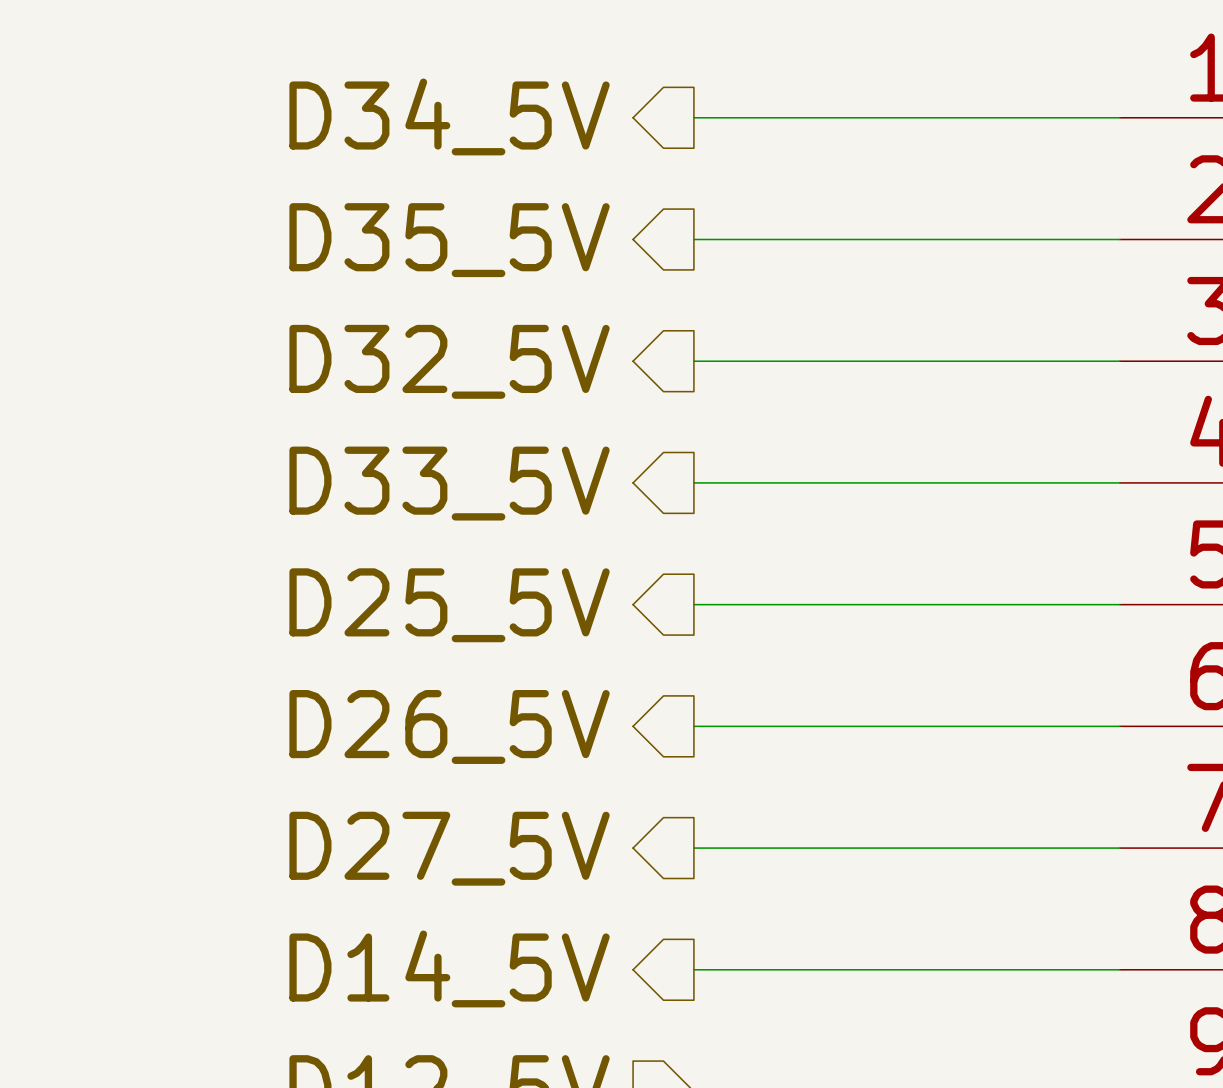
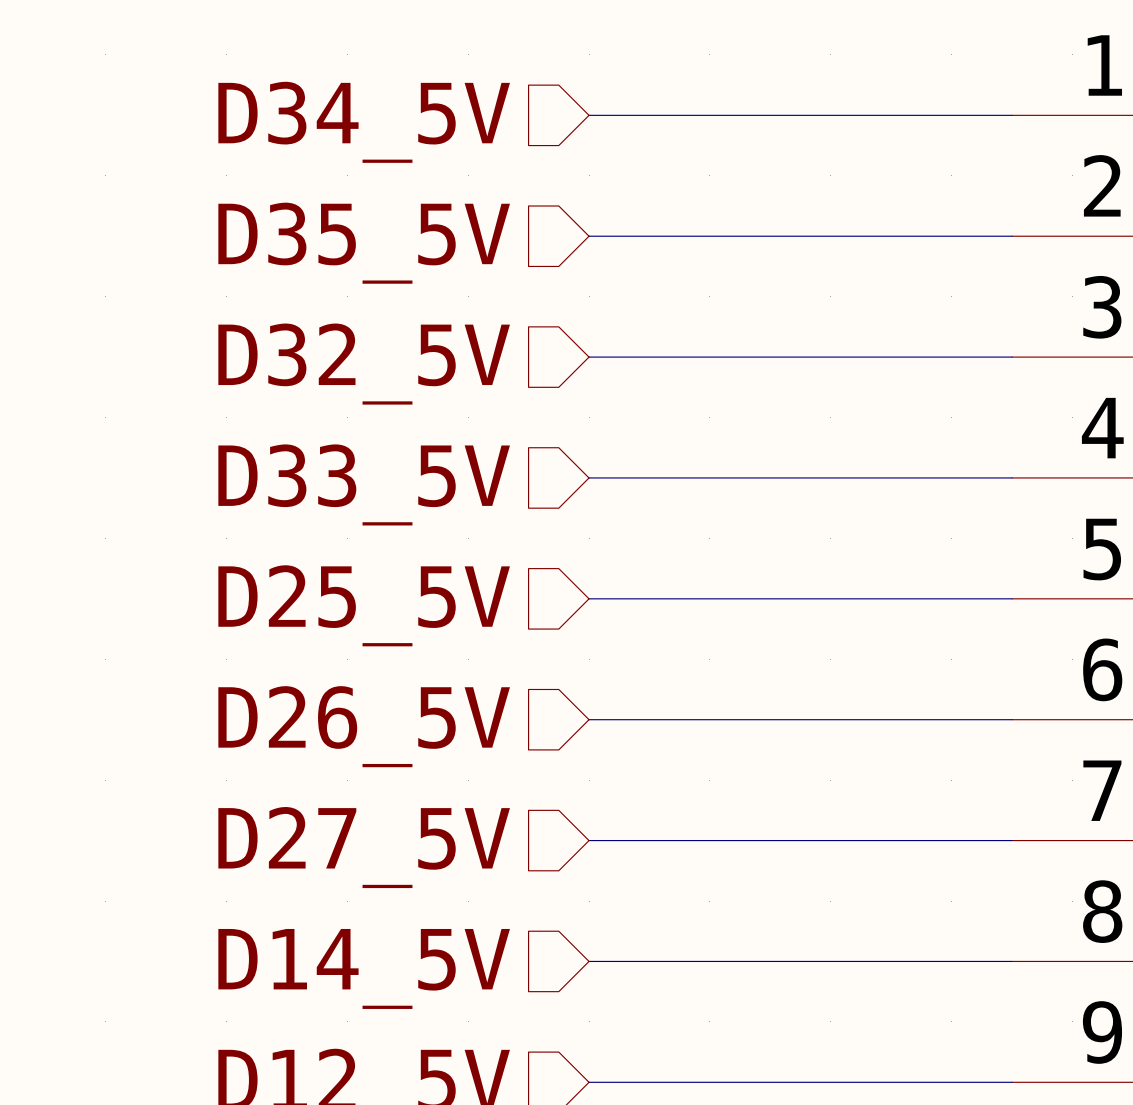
hierarchical label shape: output (449, 116) -> input (364, 122)
hierarchical label shape: output (449, 240) -> input (364, 243)
hierarchical label shape: output (449, 361) -> input (364, 364)
hierarchical label shape: output (449, 483) -> input (364, 484)
hierarchical label shape: output (449, 605) -> input (364, 605)
hierarchical label shape: output (449, 726) -> input (364, 726)
hierarchical label shape: output (449, 848) -> input (364, 847)
hierarchical label shape: output (449, 968) -> input (364, 968)

